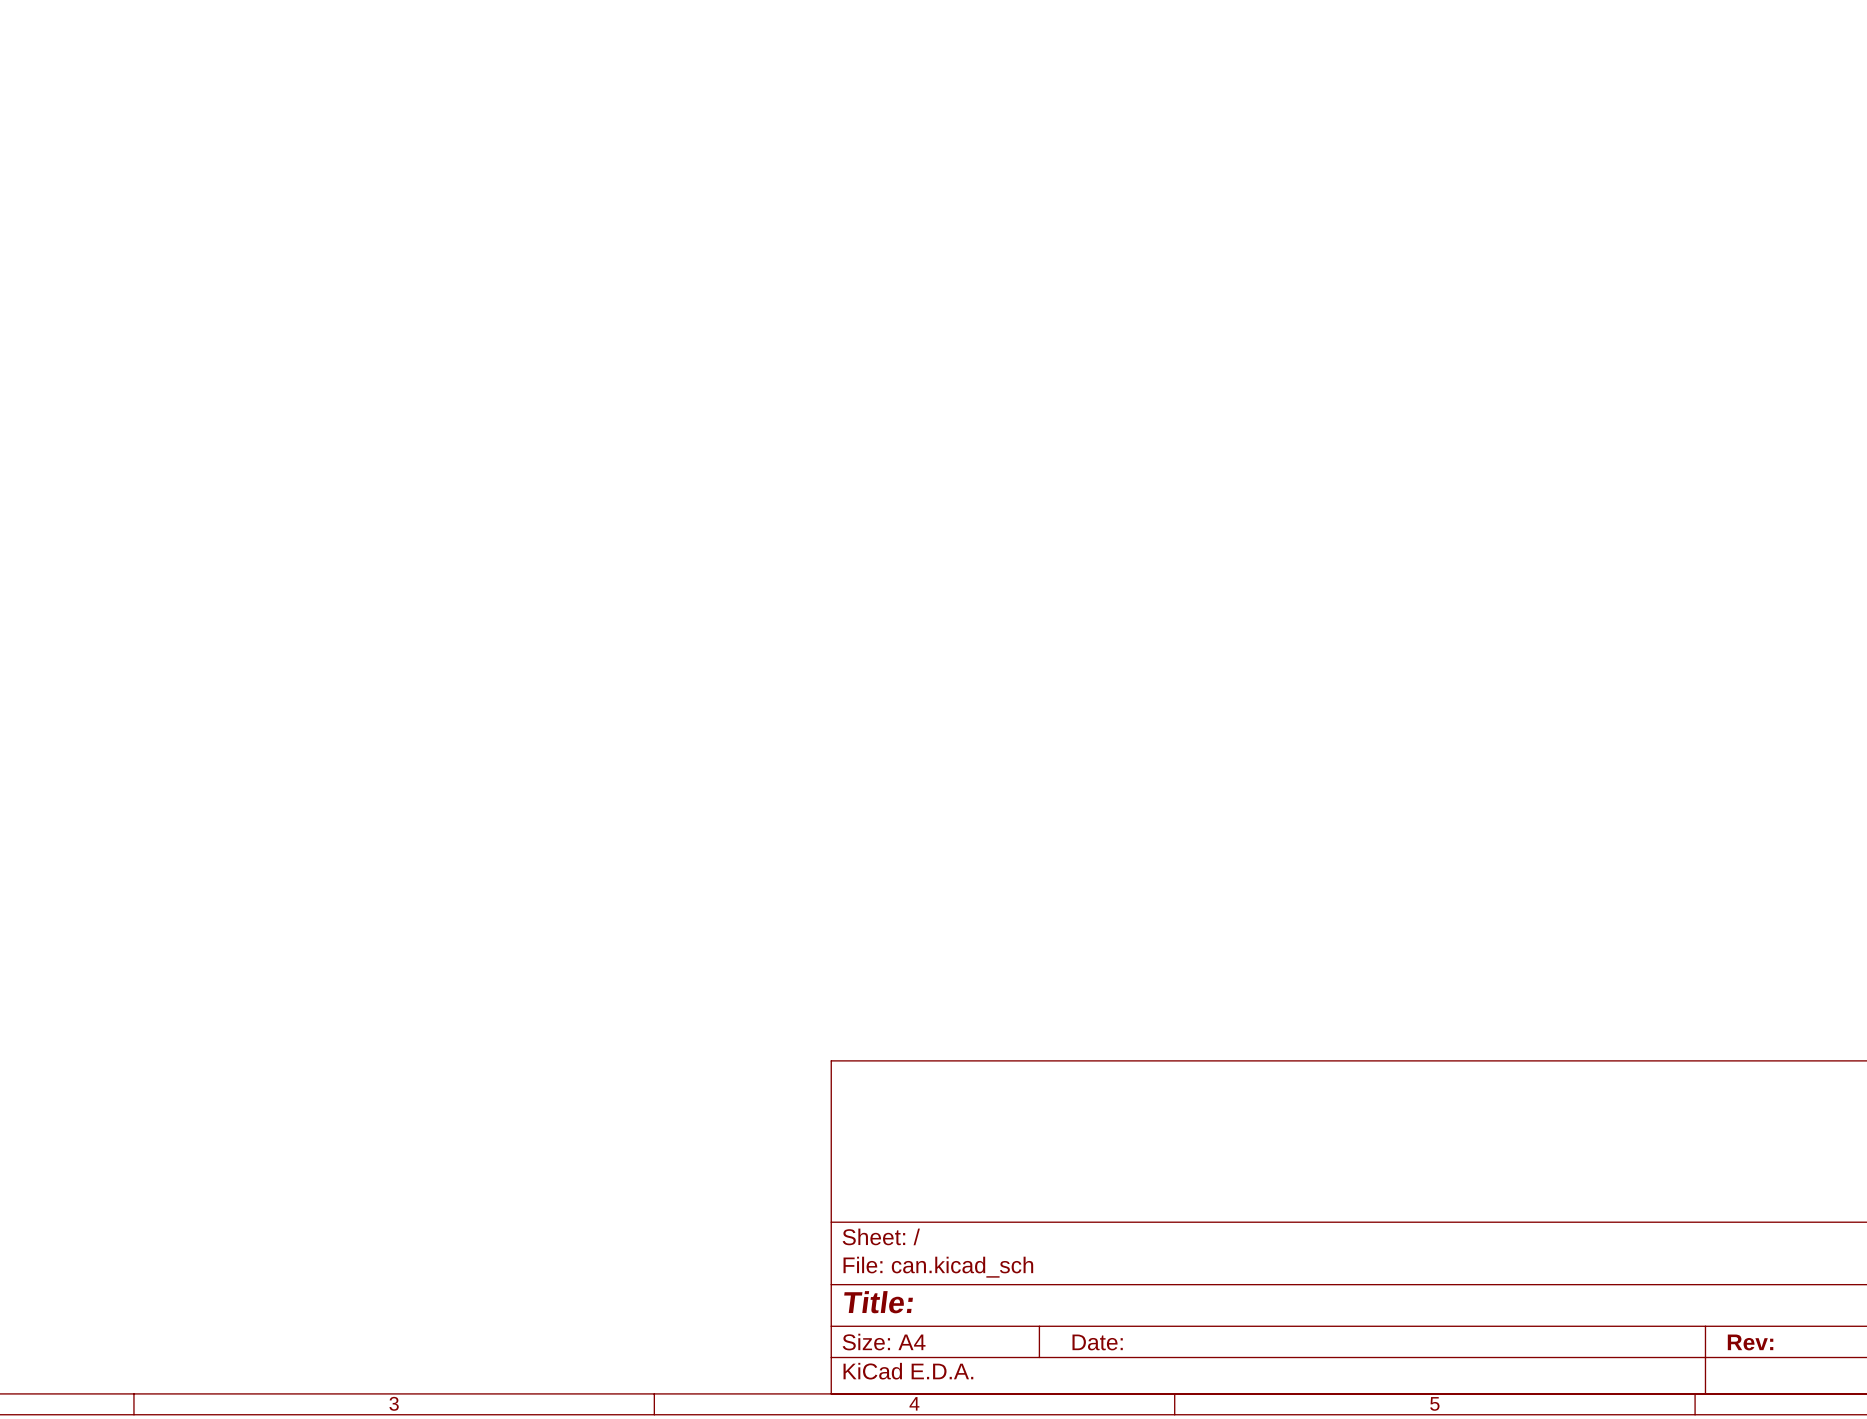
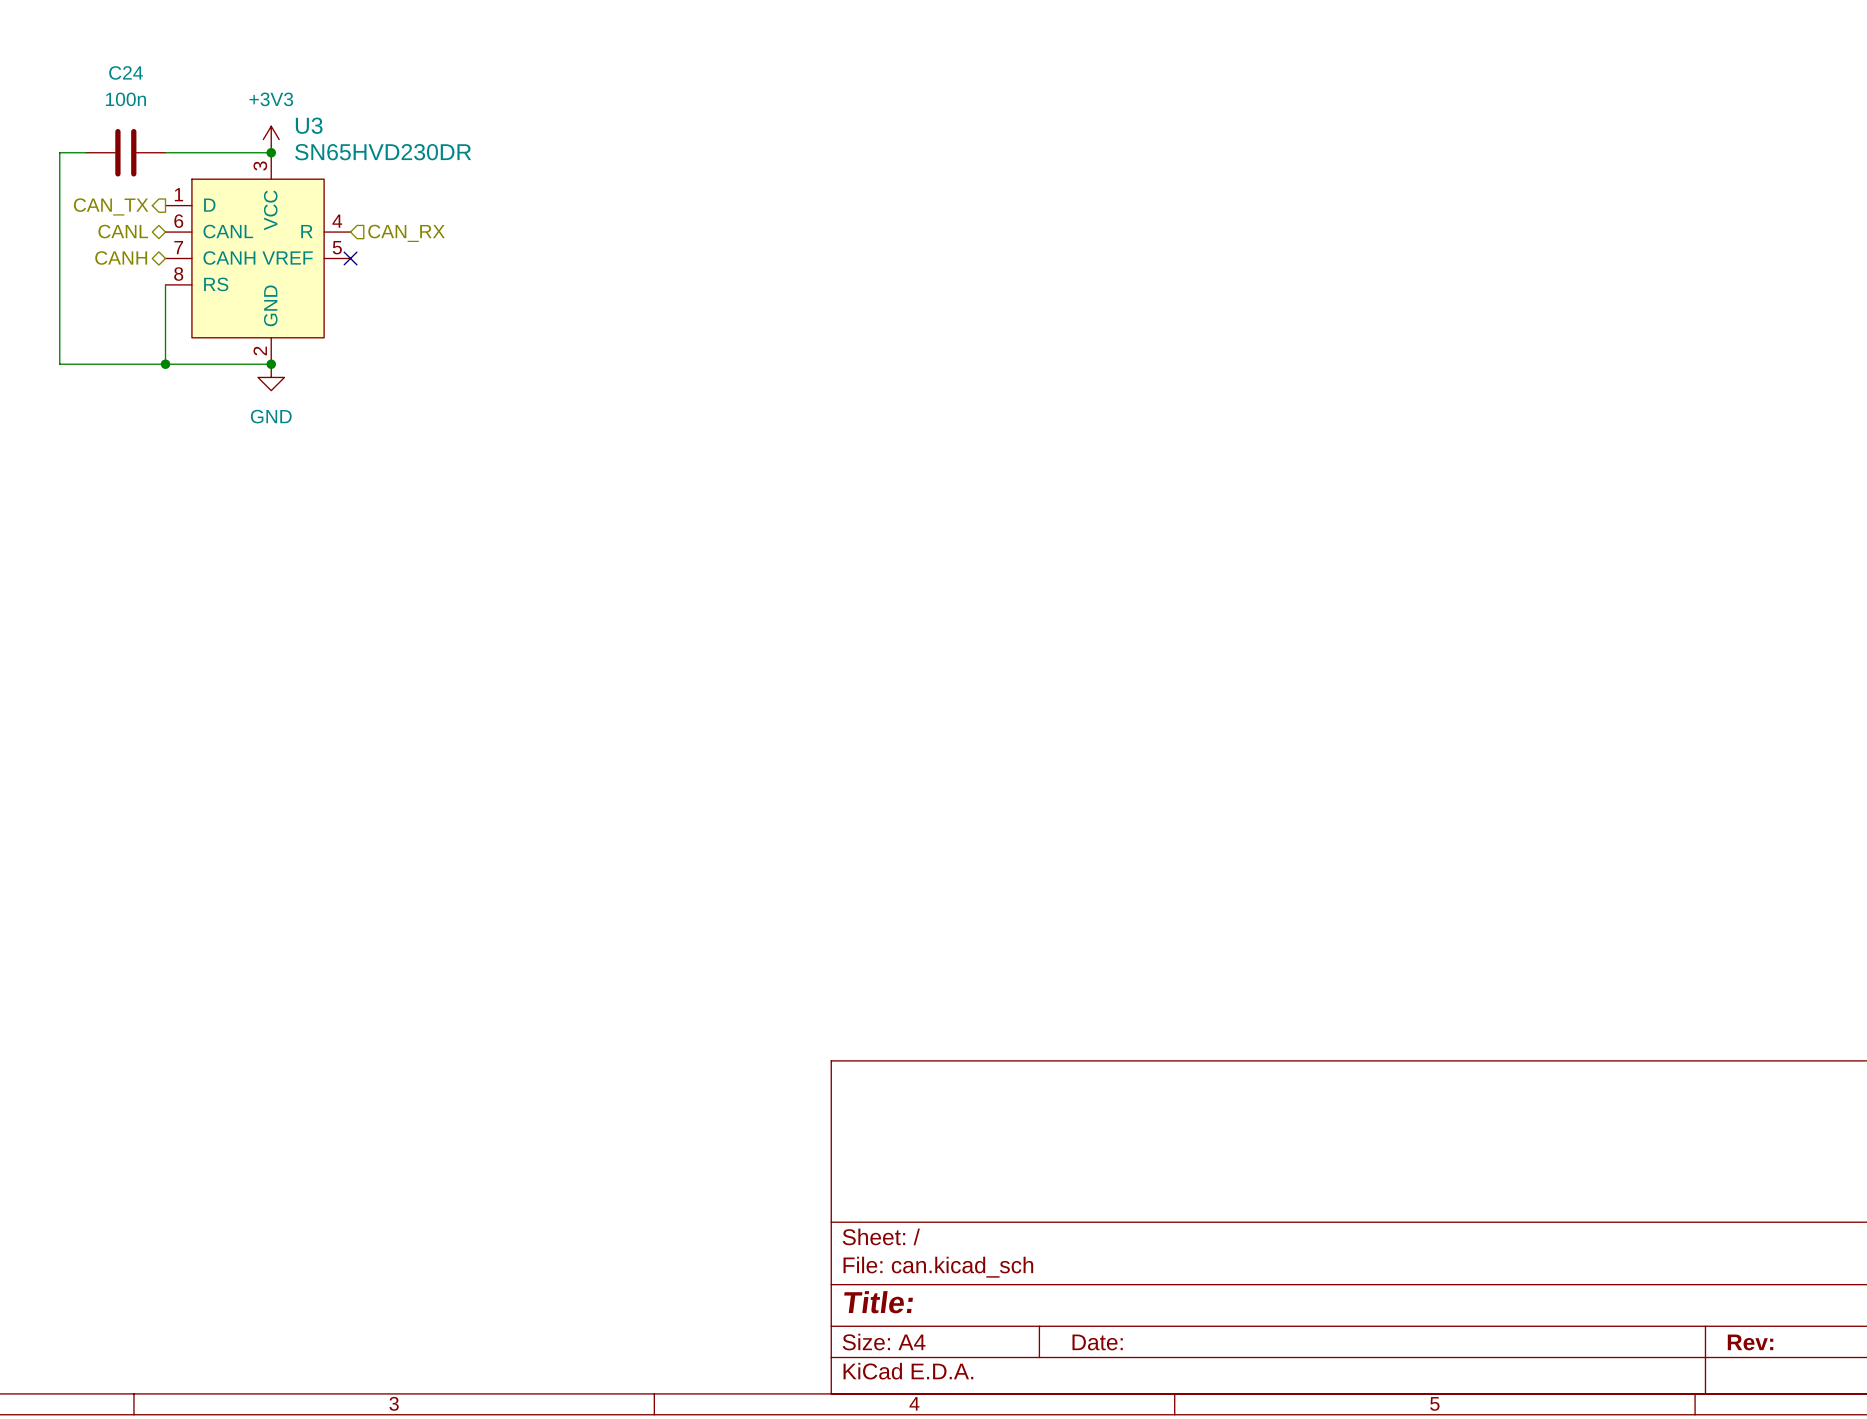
power symbol: none -> +3V3 (271, 139)
wire: none -> (86, 152) (59, 152) (59, 364) (271, 364)
C24: none -> 100n (125, 152)
wire: none -> (165, 152) (271, 152)
junction: none -> (271, 152)
hierarchical label: none -> CAN_TX (111, 206)
hierarchical label: none -> CANL (123, 231)
hierarchical label: none -> CAN_RX (406, 233)
hierarchical label: none -> CANH (121, 257)
U3: none -> SN65HVD230DR (258, 258)
no-connect mark: none -> (350, 258)
wire: none -> (165, 284) (165, 364)
junction: none -> (165, 364)
junction: none -> (271, 364)
power symbol: none -> GND (271, 377)

